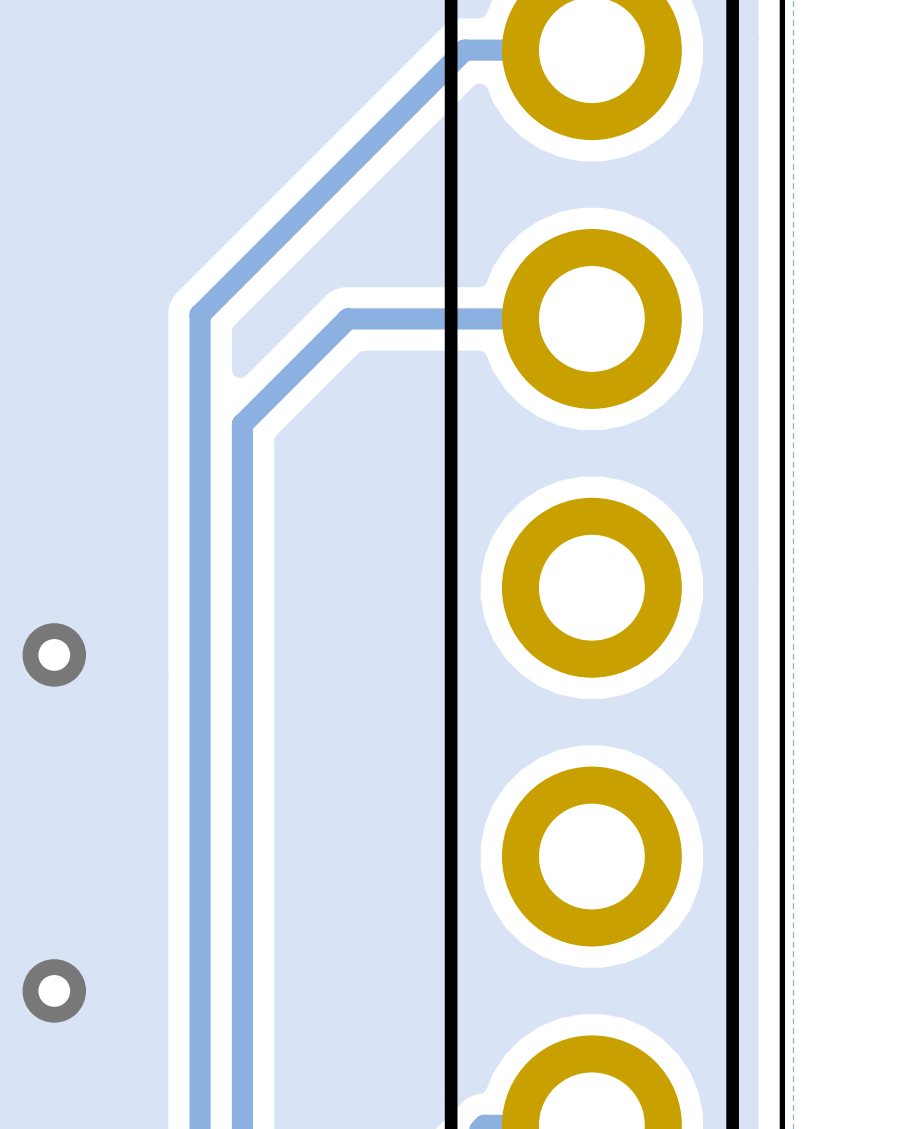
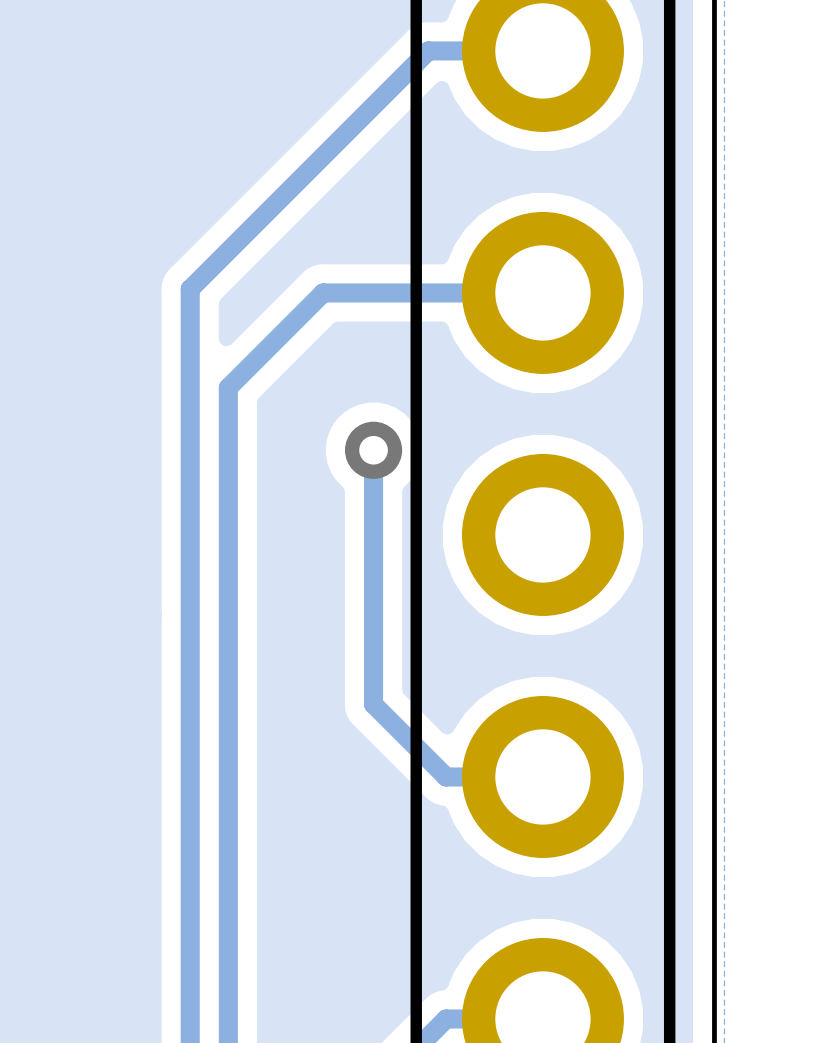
track: none -> (373, 450) (373, 704) (446, 776) (542, 776)
via: none -> (373, 450)
via: (54, 654) -> none
via: (54, 990) -> none

